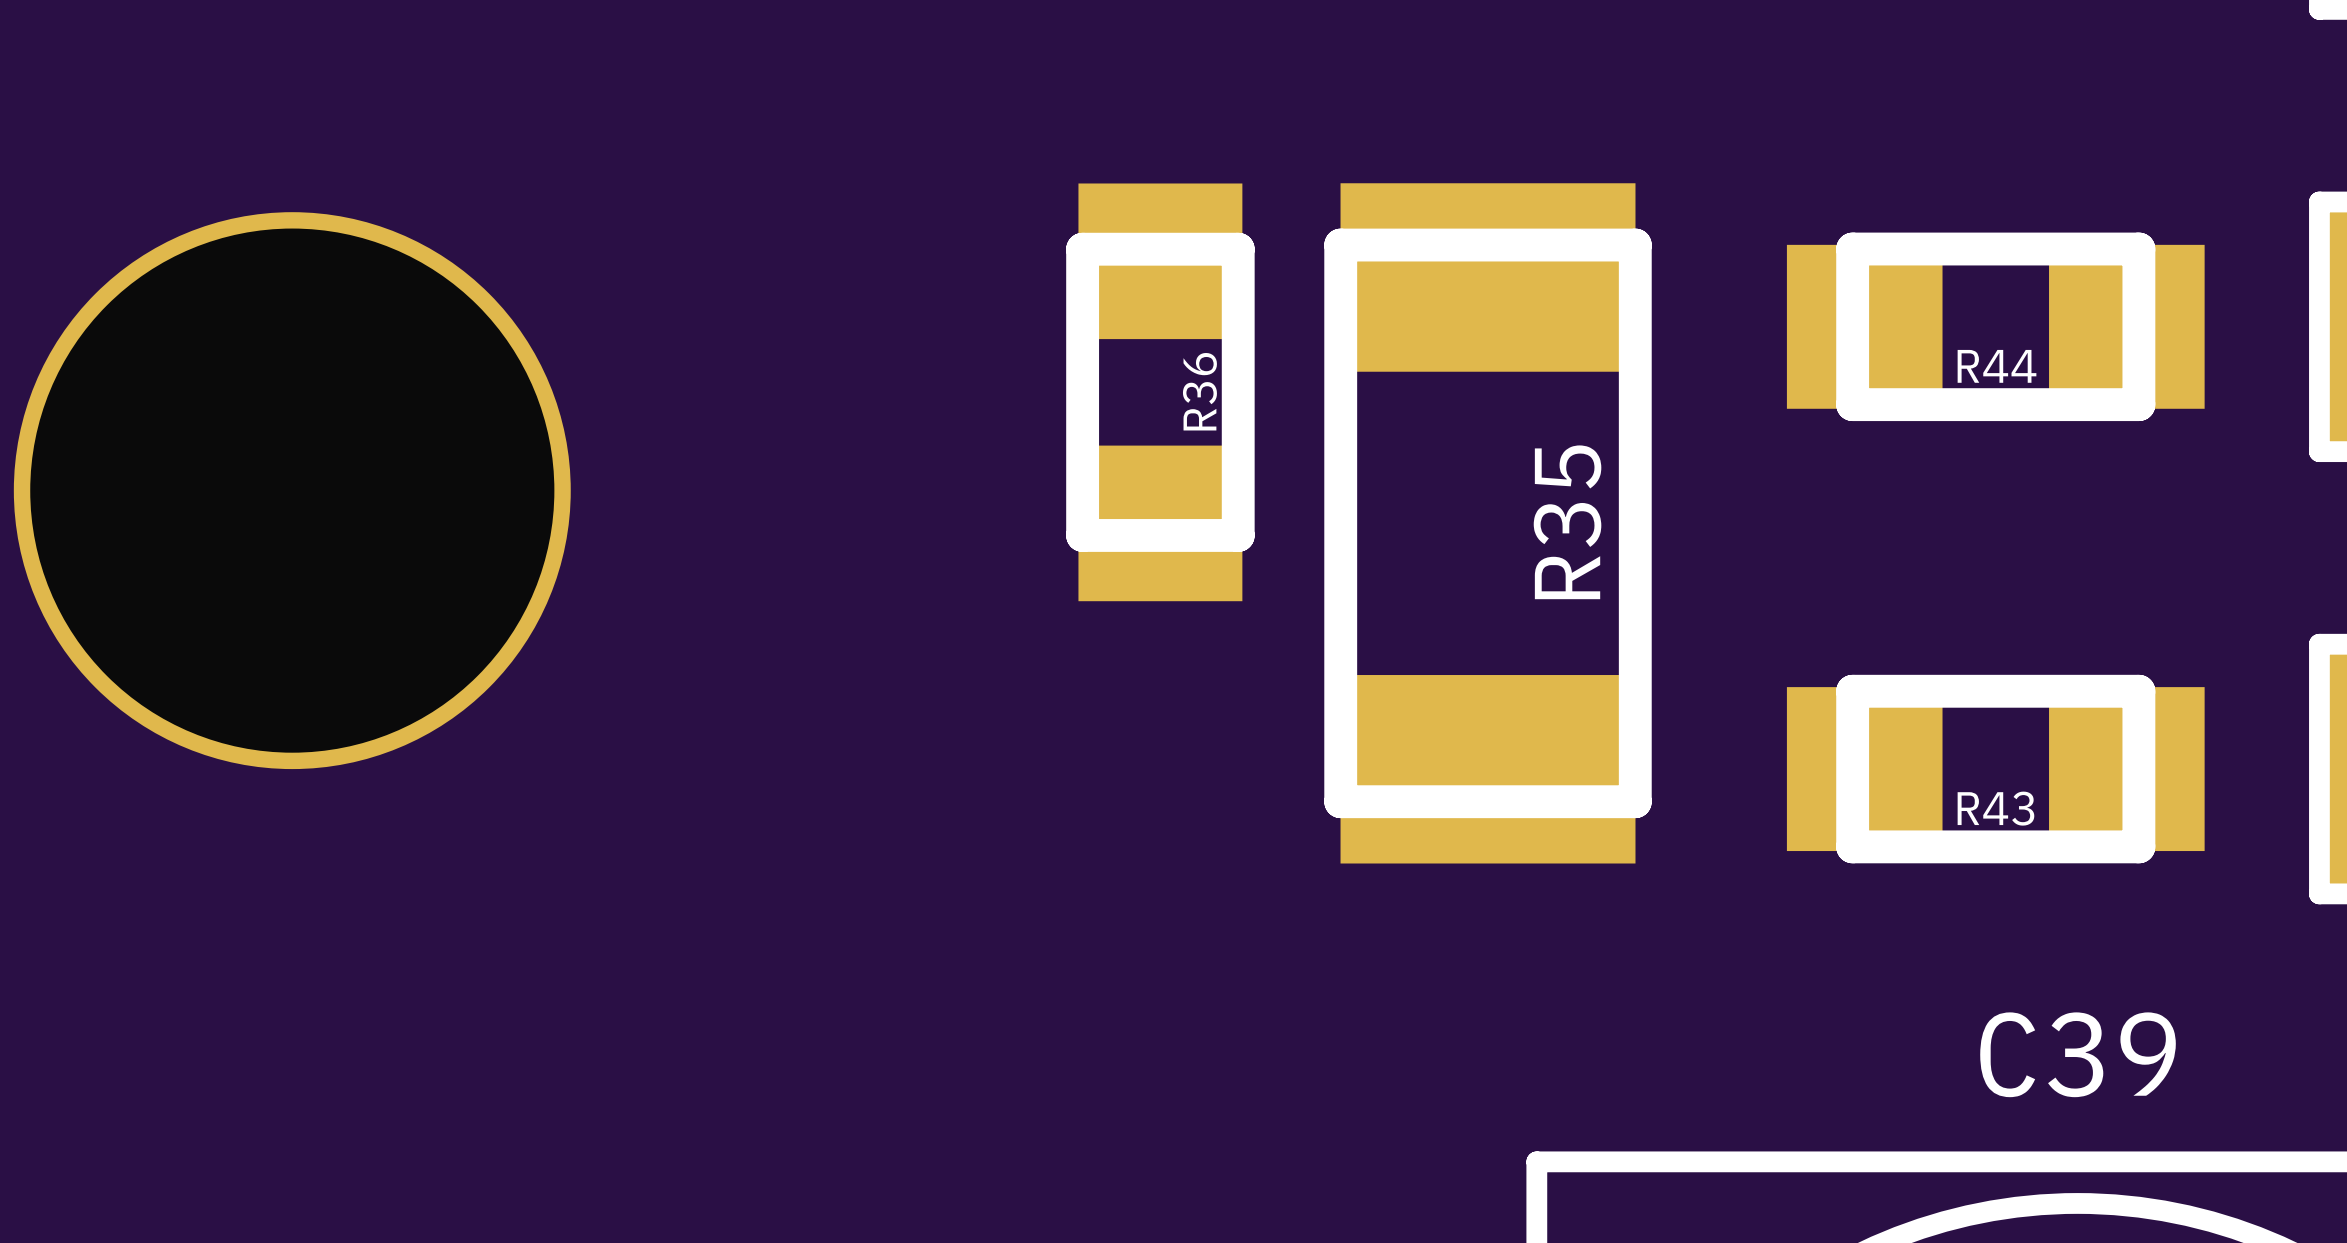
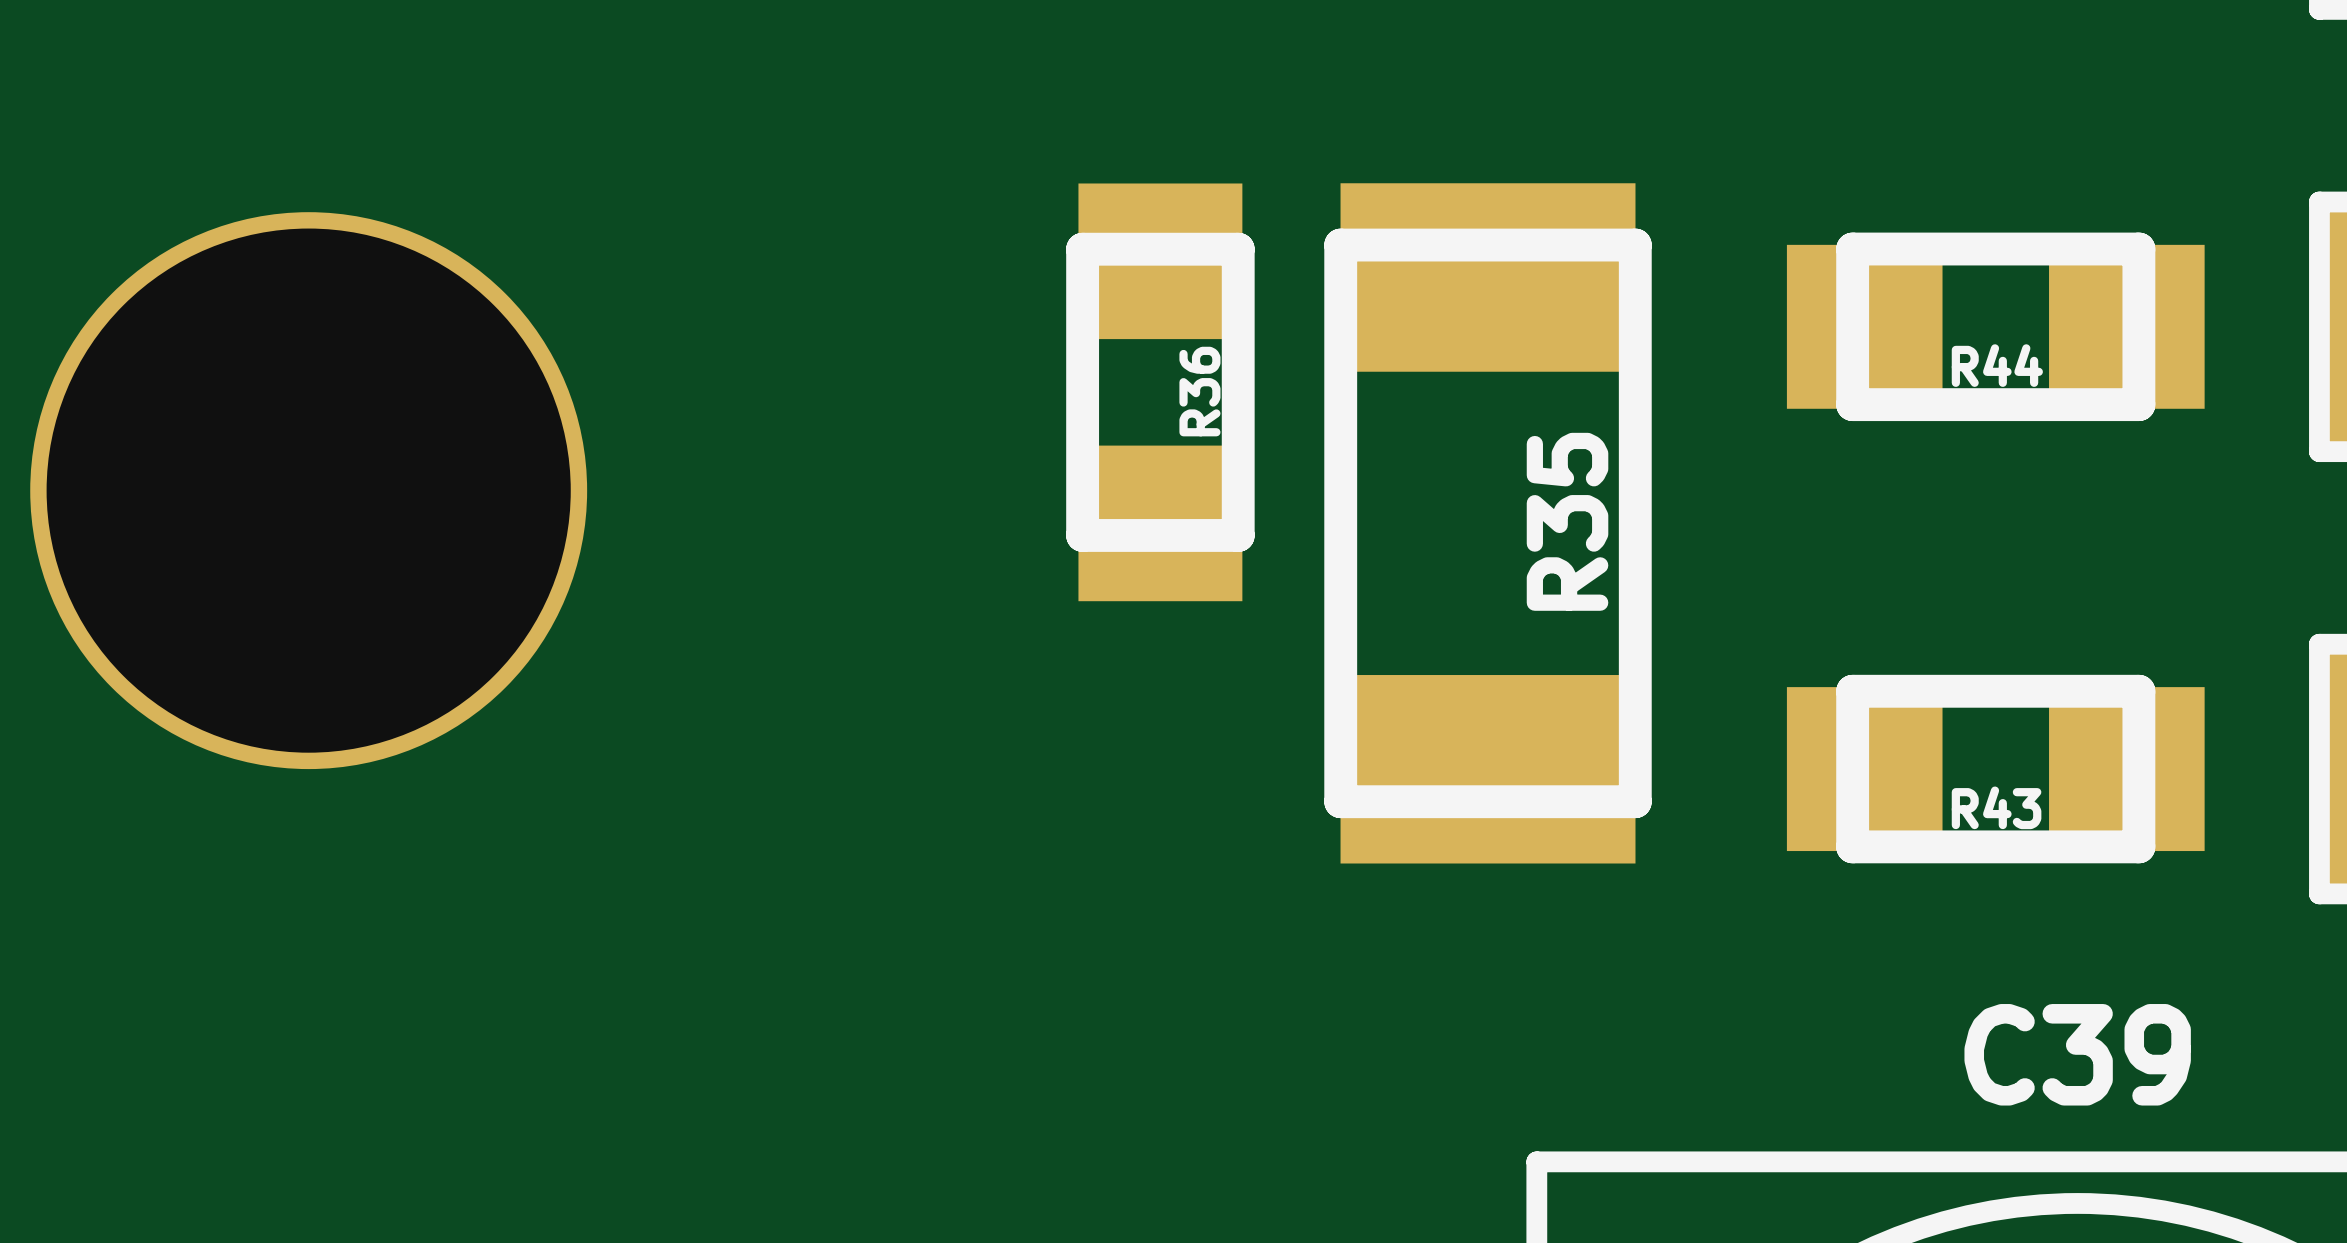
part position: (292, 490) -> (308, 490)

